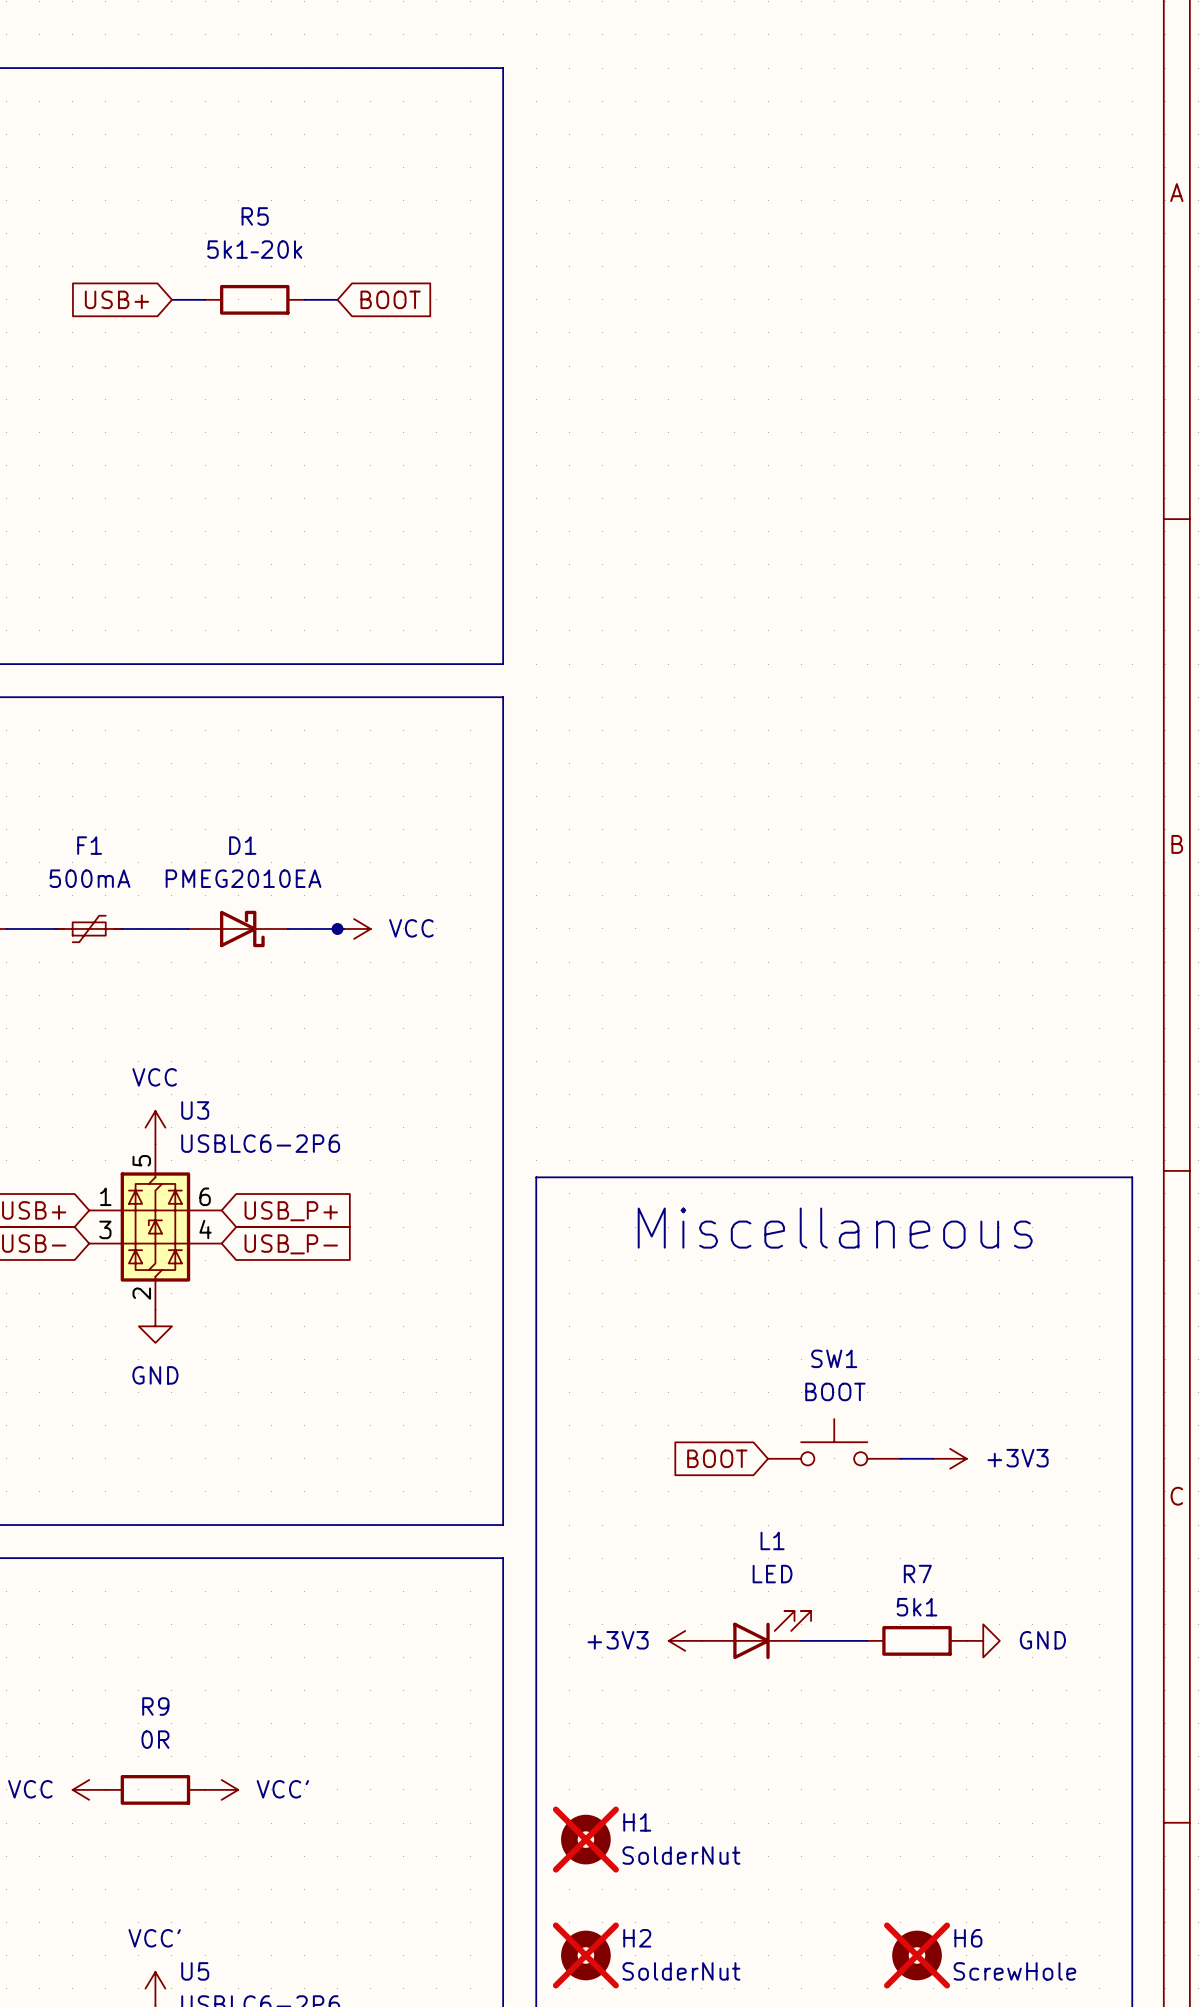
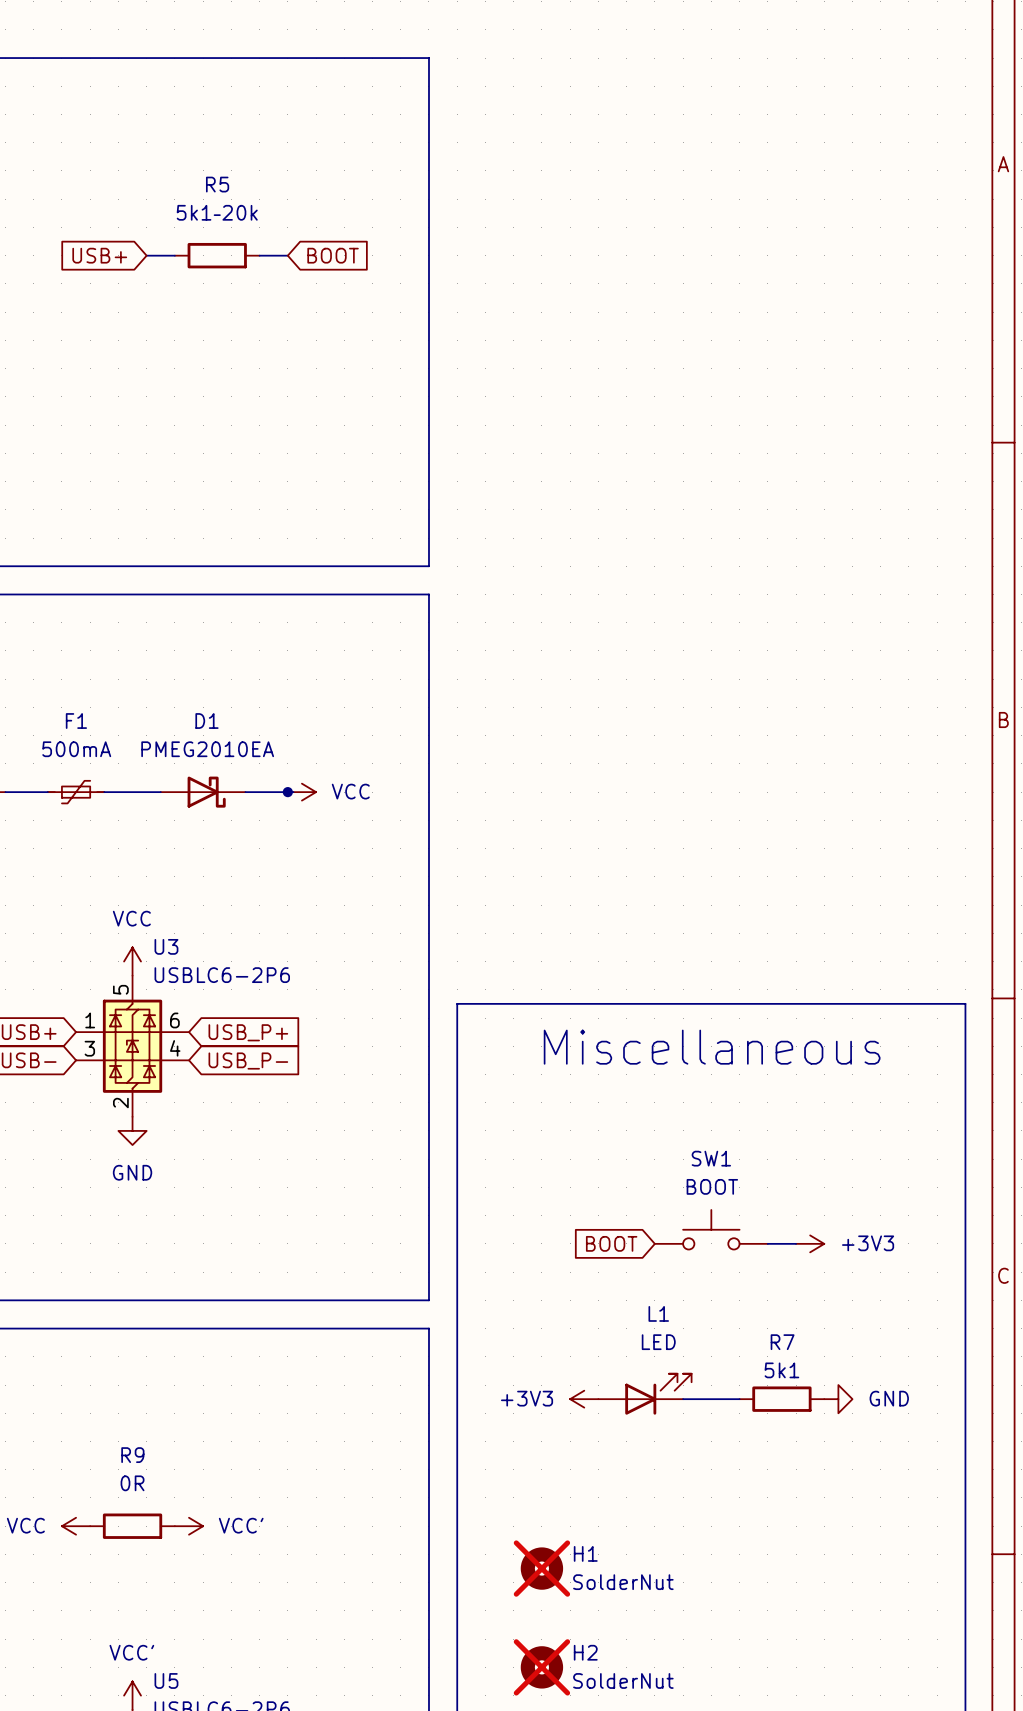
H1 position: (585, 1839) -> (541, 1568)
H2 position: (585, 1955) -> (541, 1667)
H6: ScrewHole (917, 1955) -> none

